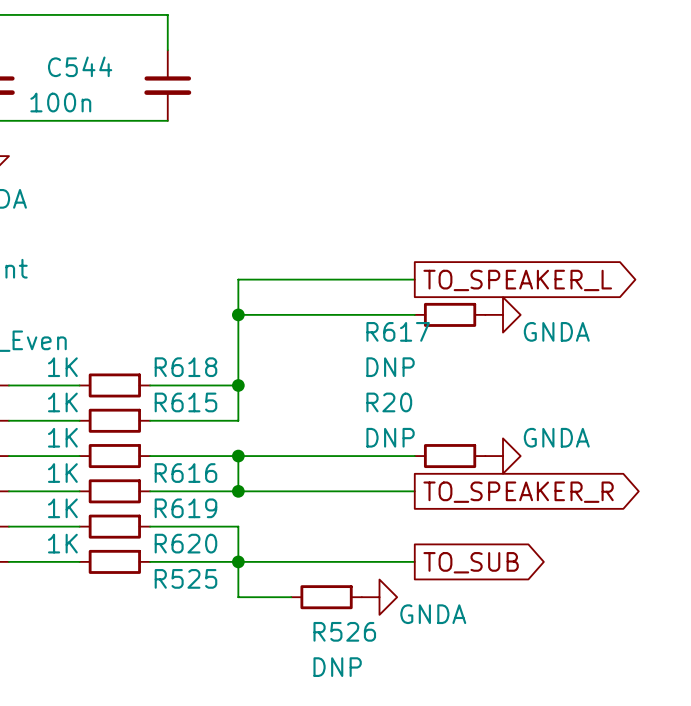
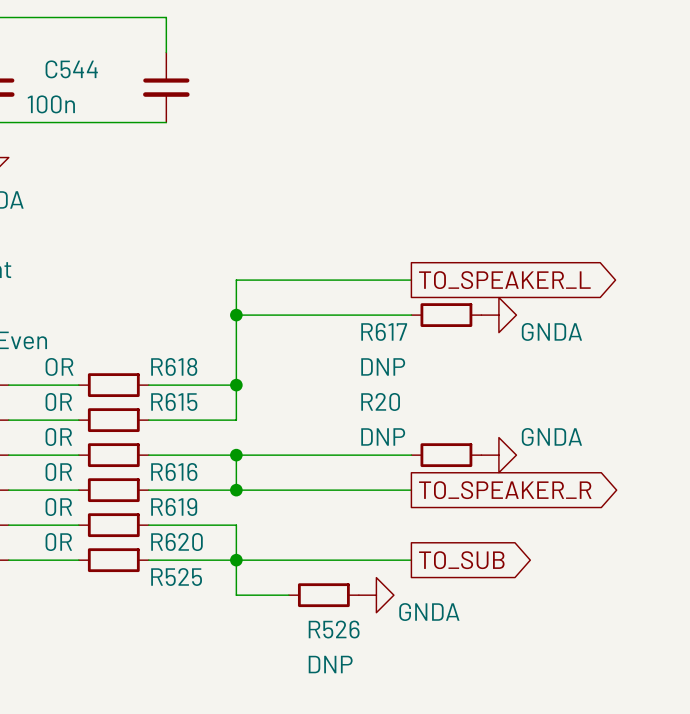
R618 value: 1K (62, 367) -> OR (59, 366)
R615 value: 1K (62, 402) -> 0R (58, 401)
R616 value: 1K (62, 437) -> 0R (58, 436)
R619 value: 1K (62, 473) -> 0R (58, 472)
R620 value: 1K (62, 508) -> 0R (58, 507)
R525 value: 1K (62, 543) -> 0R (58, 542)

